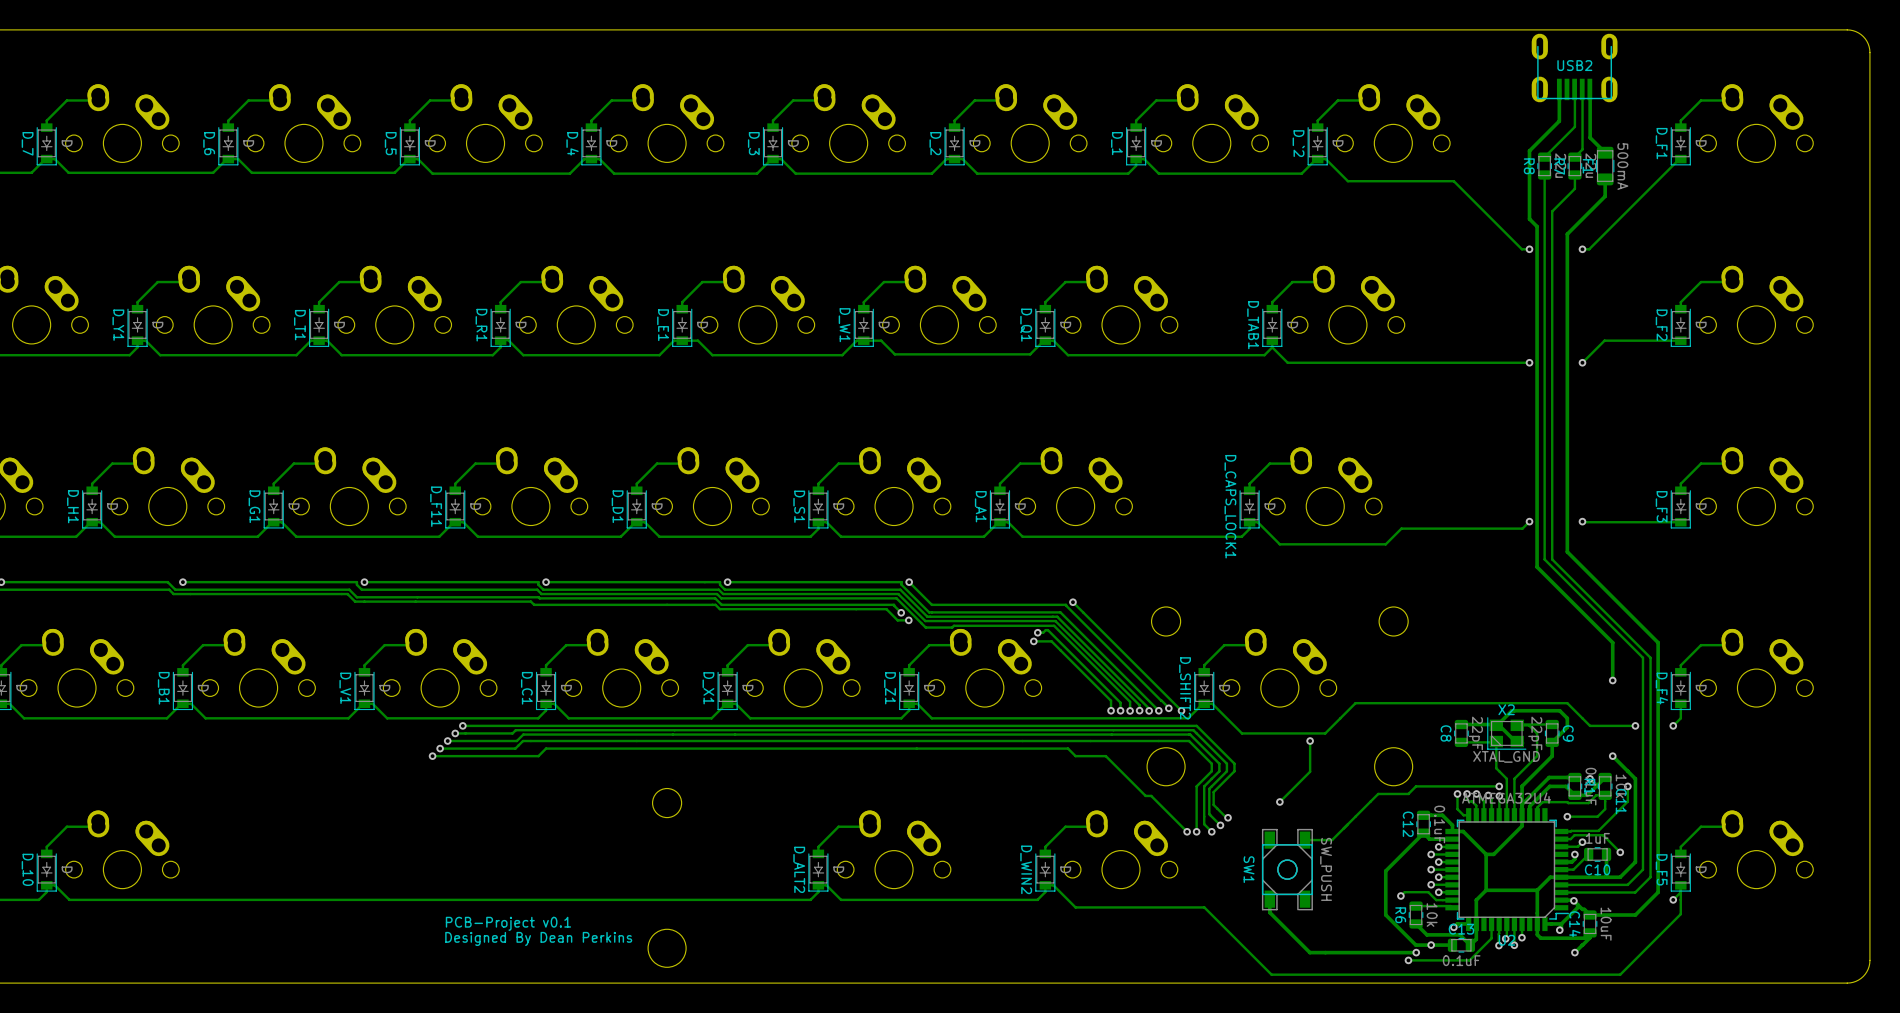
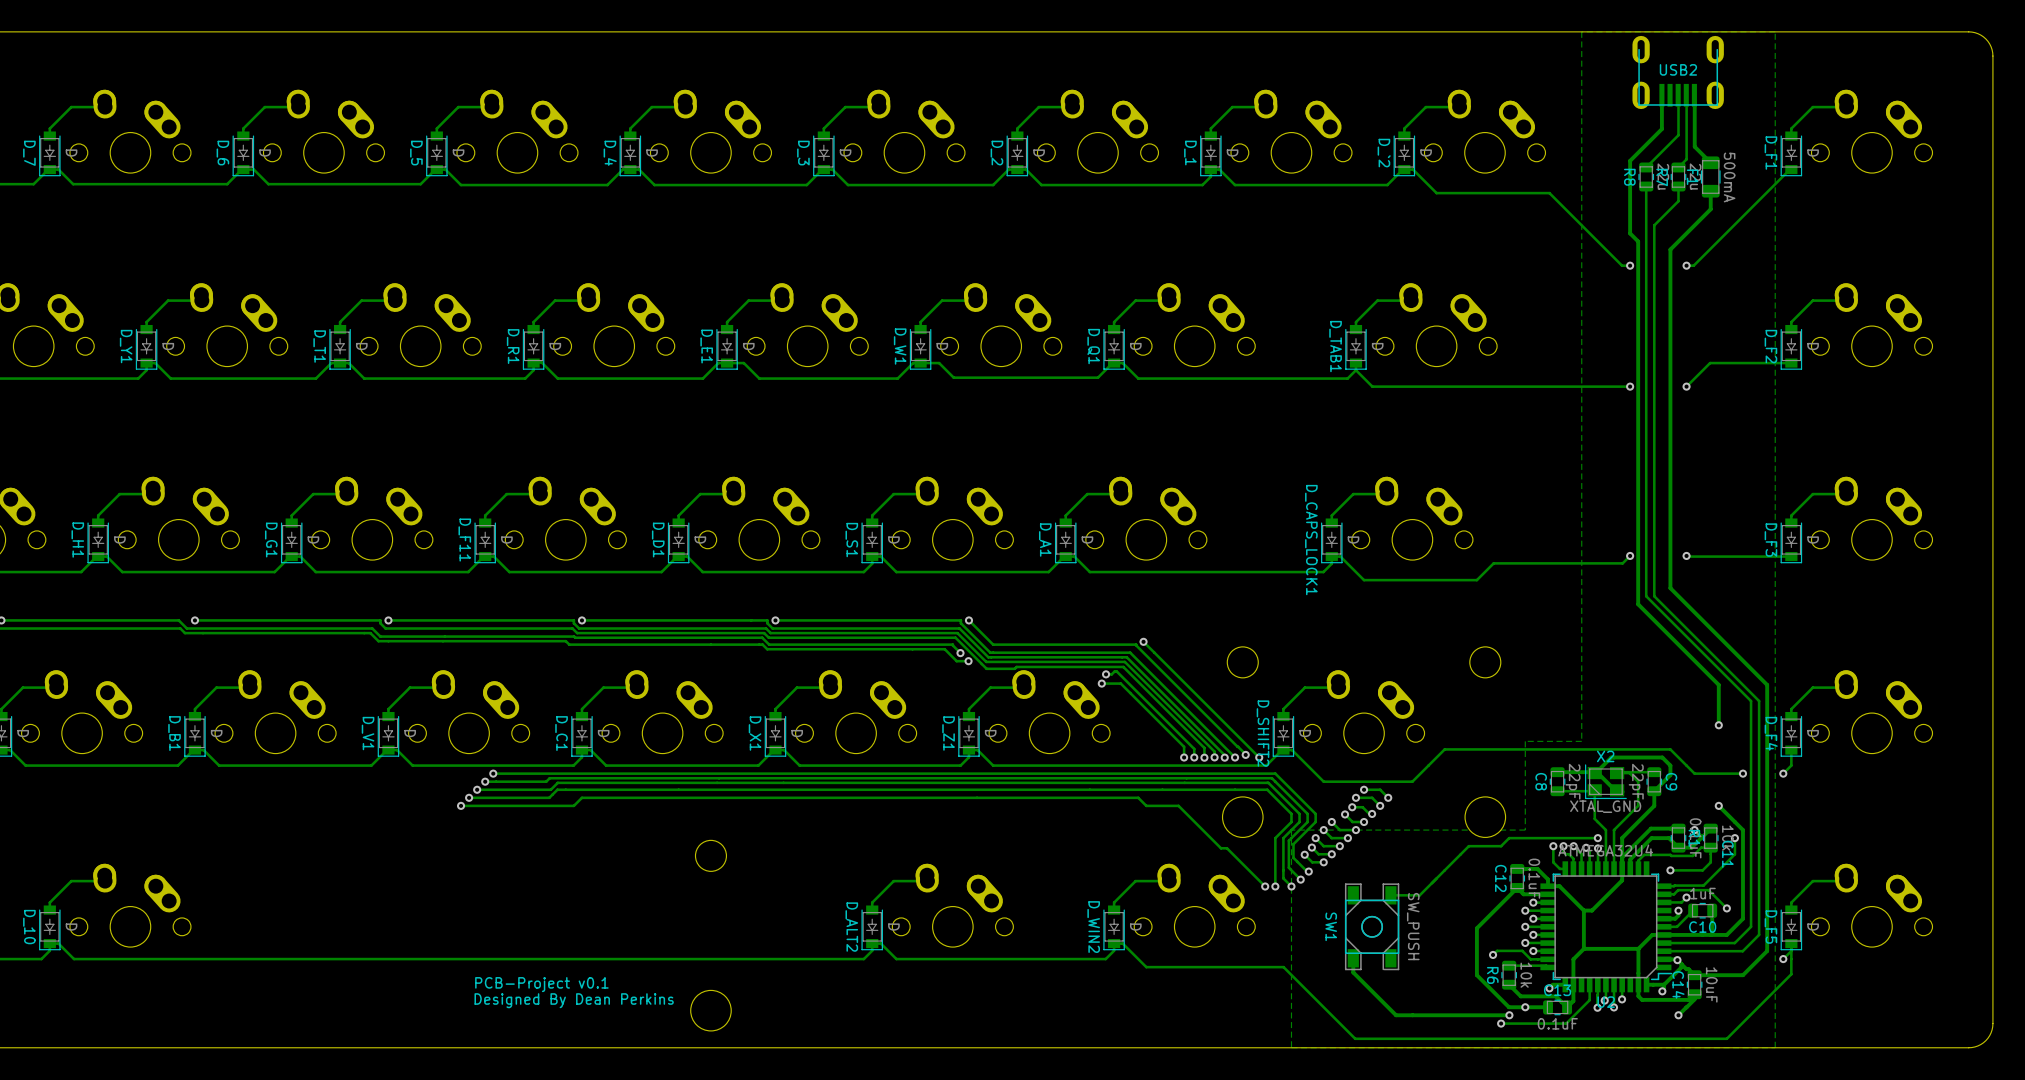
zone outline: none -> (1775, 31) (1581, 31) (1581, 741) (1525, 741) (1525, 830) (1291, 830) (1291, 1047) (1775, 1047) (1775, 31)
track: none -> (1364, 789) (1380, 789) (1388, 797)
via: none -> (1364, 789)
track: (1310, 741) (1310, 771) (1279, 801) -> none
via: (1310, 741) -> none
track: none -> (1355, 797) (1372, 797) (1380, 805)
via: none -> (1355, 797)
via: none -> (1388, 797)
via: none -> (1380, 805)
track: none -> (1352, 807) (1362, 807) (1369, 813) (1372, 813)
via: none -> (1352, 807)
via: none -> (1372, 813)
track: none -> (1345, 814) (1352, 822) (1364, 822)
via: none -> (1345, 814)
track: none -> (1331, 822) (1339, 830) (1355, 830)
via: none -> (1331, 822)
via: none -> (1364, 822)
track: none -> (1323, 830) (1331, 838) (1347, 838)
via: none -> (1323, 830)
via: none -> (1355, 830)
track: none -> (1315, 838) (1323, 846) (1339, 846)
via: none -> (1315, 838)
via: none -> (1347, 838)
via: none -> (1339, 846)
track: none -> (1311, 847) (1318, 854) (1331, 854)
via: none -> (1311, 847)
via: none -> (1331, 854)
via: (1279, 801) -> none
track: none -> (1304, 854) (1312, 862) (1323, 862)
via: none -> (1304, 854)
via: none -> (1323, 862)

